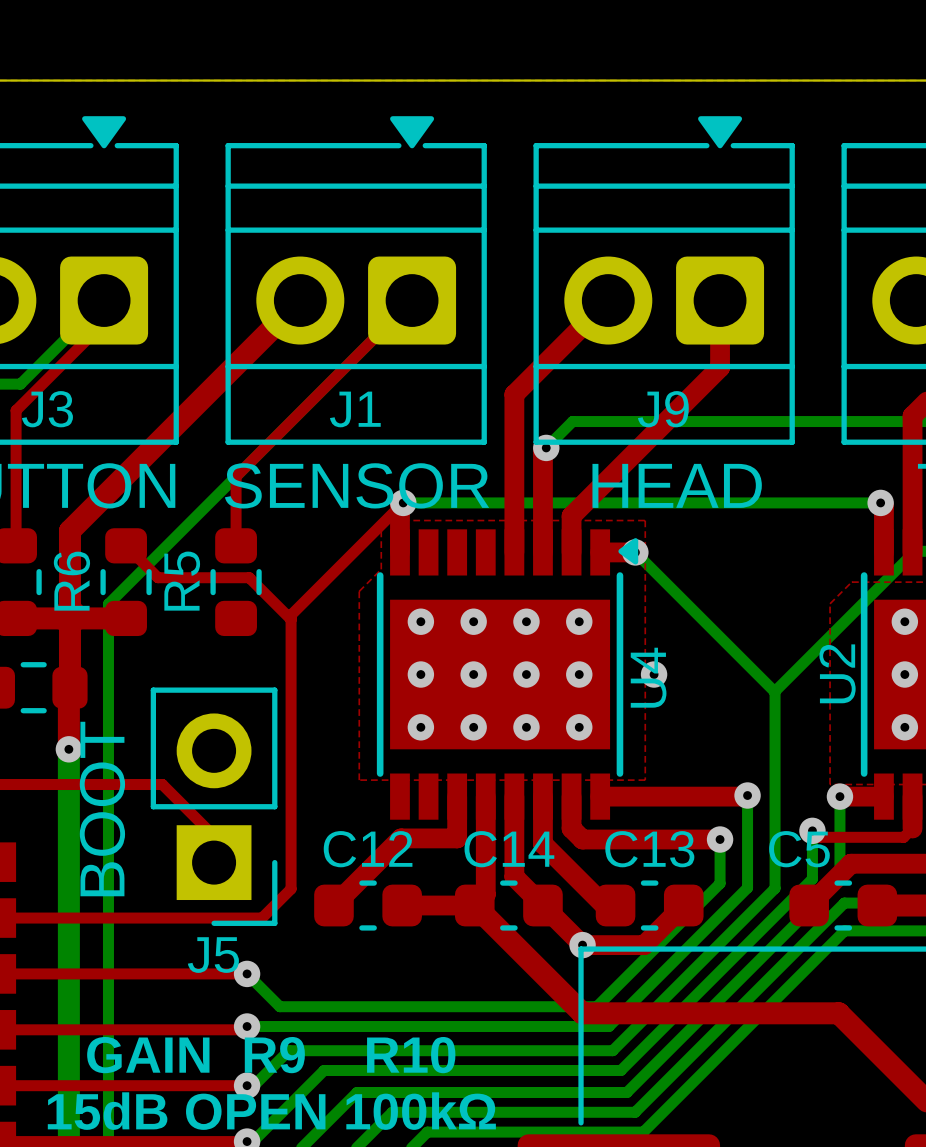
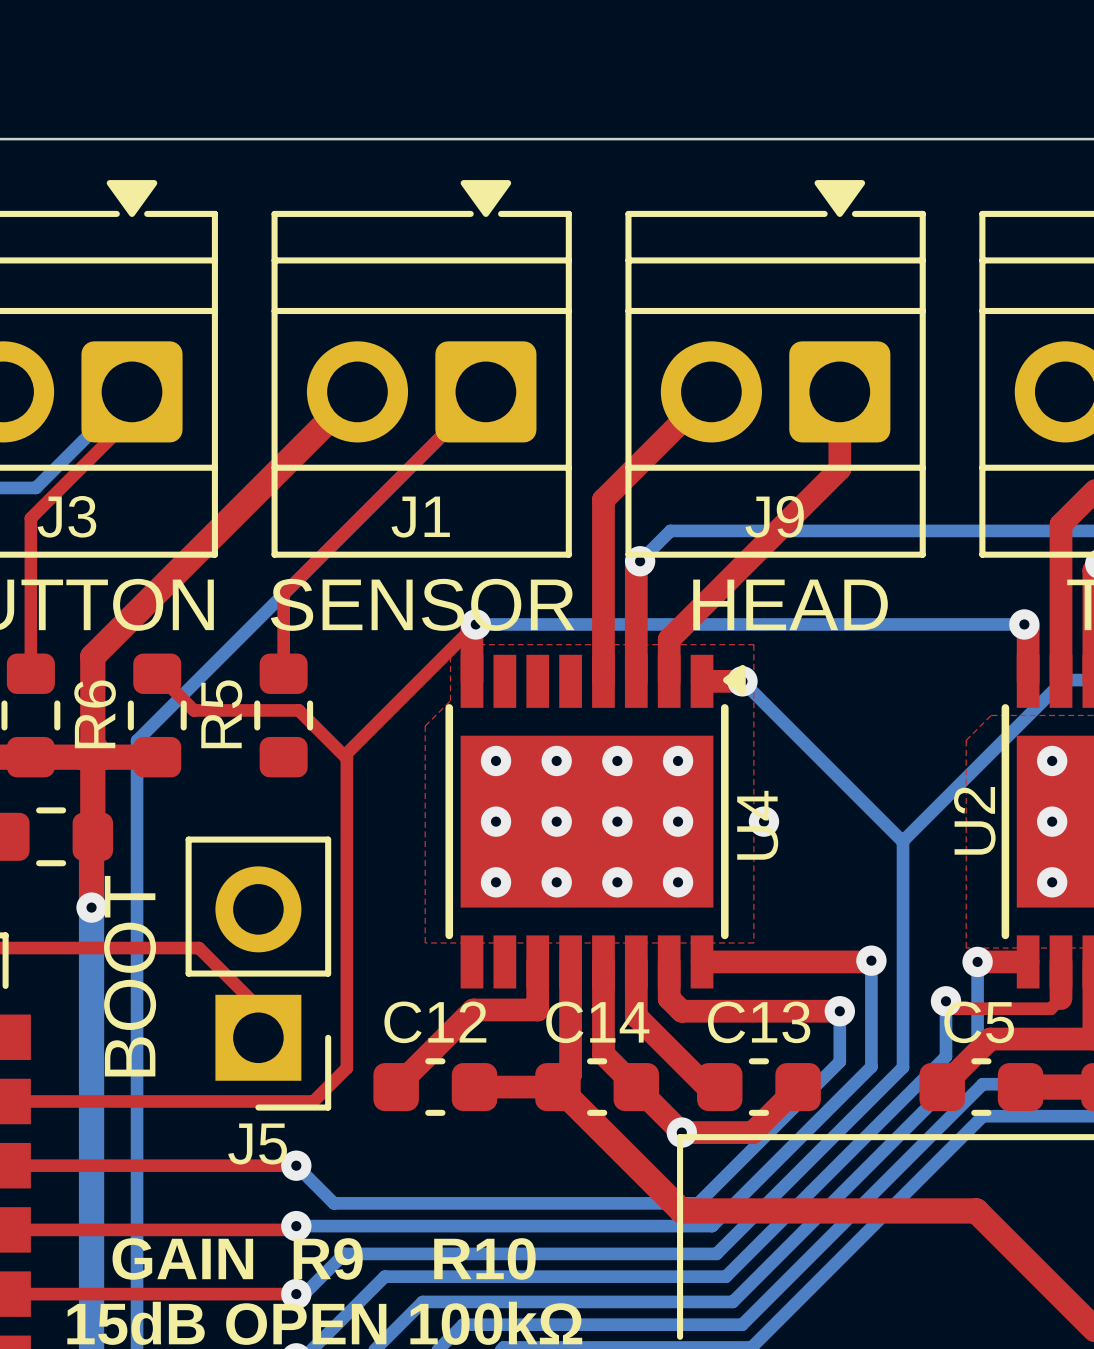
C5 name position: C5 (799, 849) -> C5 (979, 1022)

